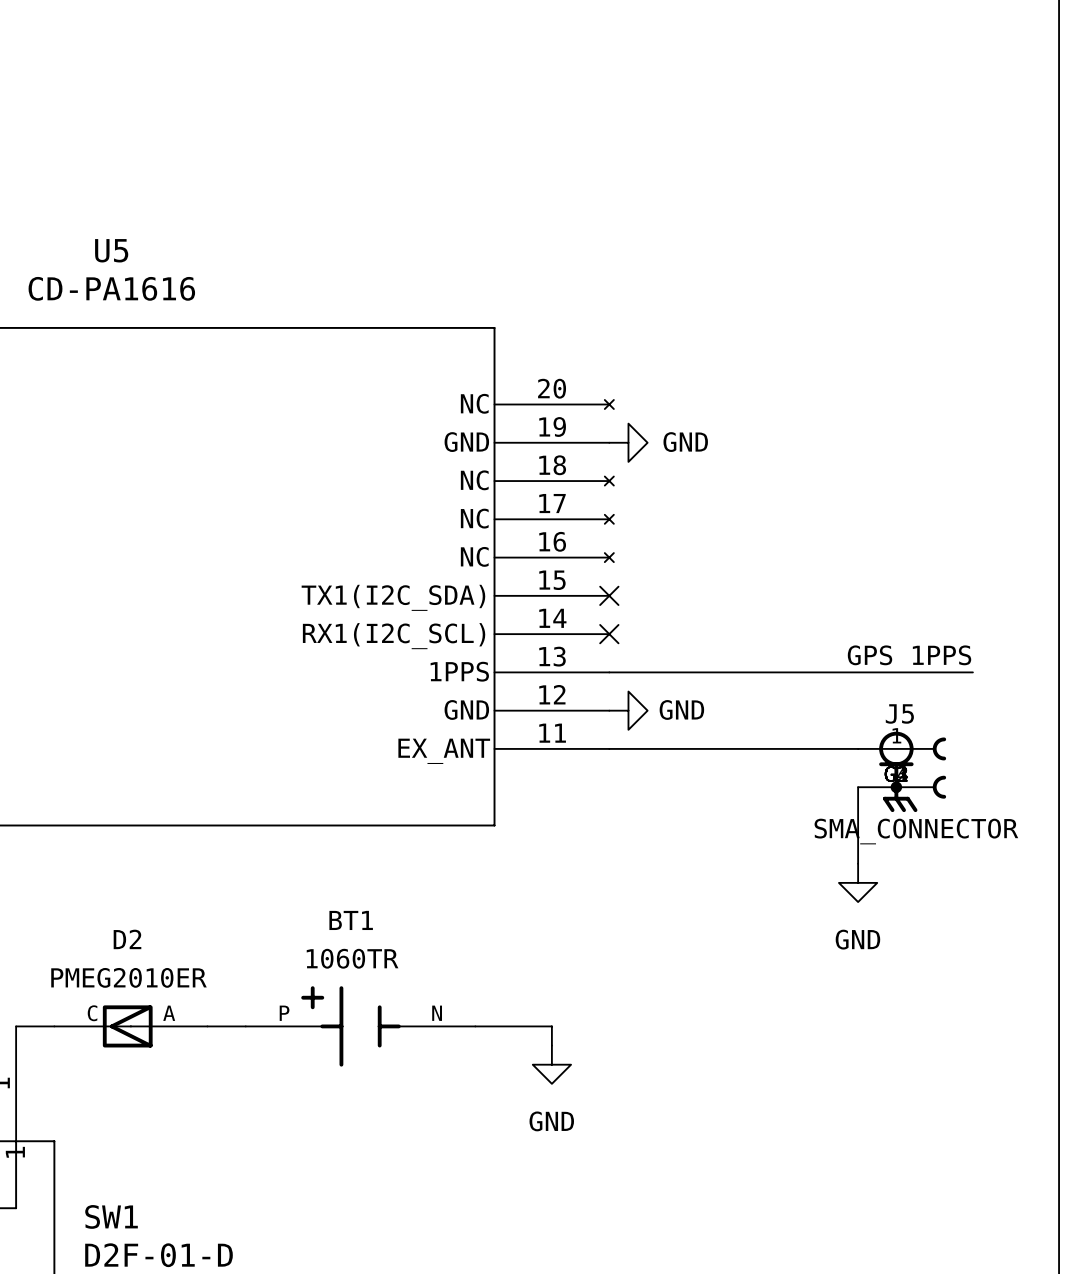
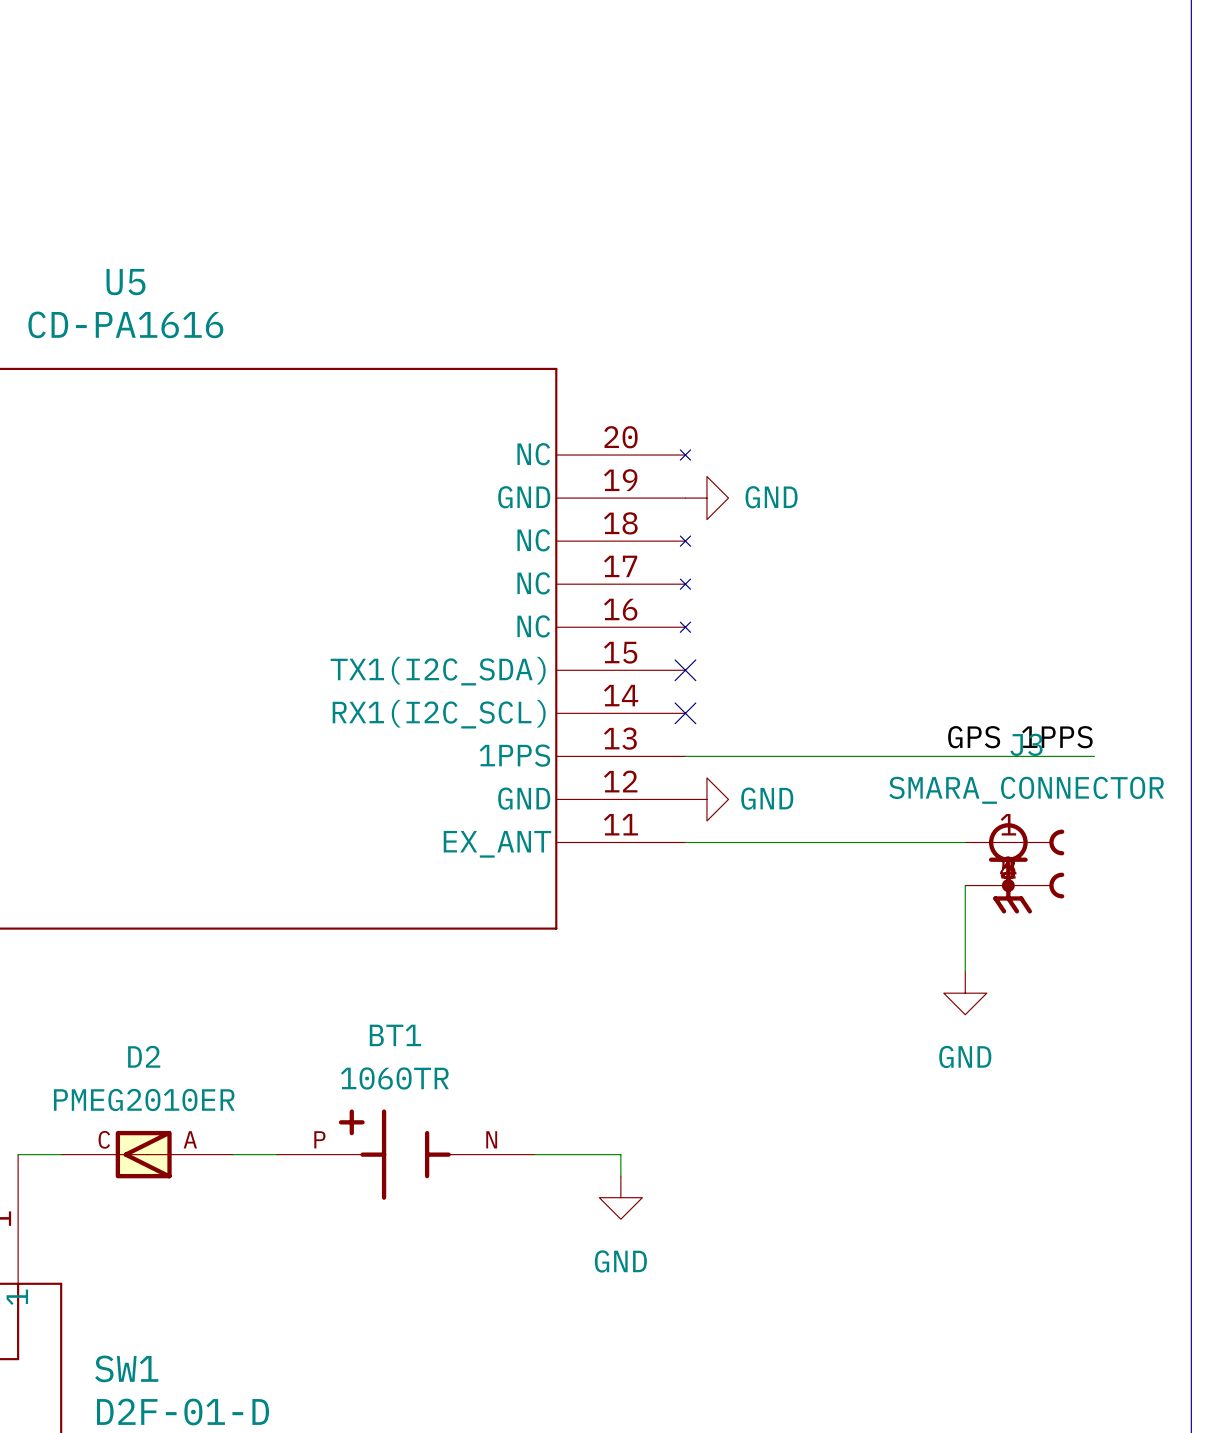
J5 name: J5 (899, 713) -> J3 (1026, 744)
J5 symbol: [858, 731, 947, 813] -> [965, 823, 1065, 914]
J5 value: SMA_CONNECTOR (916, 831) -> SMARA_CONNECTOR (1026, 790)

